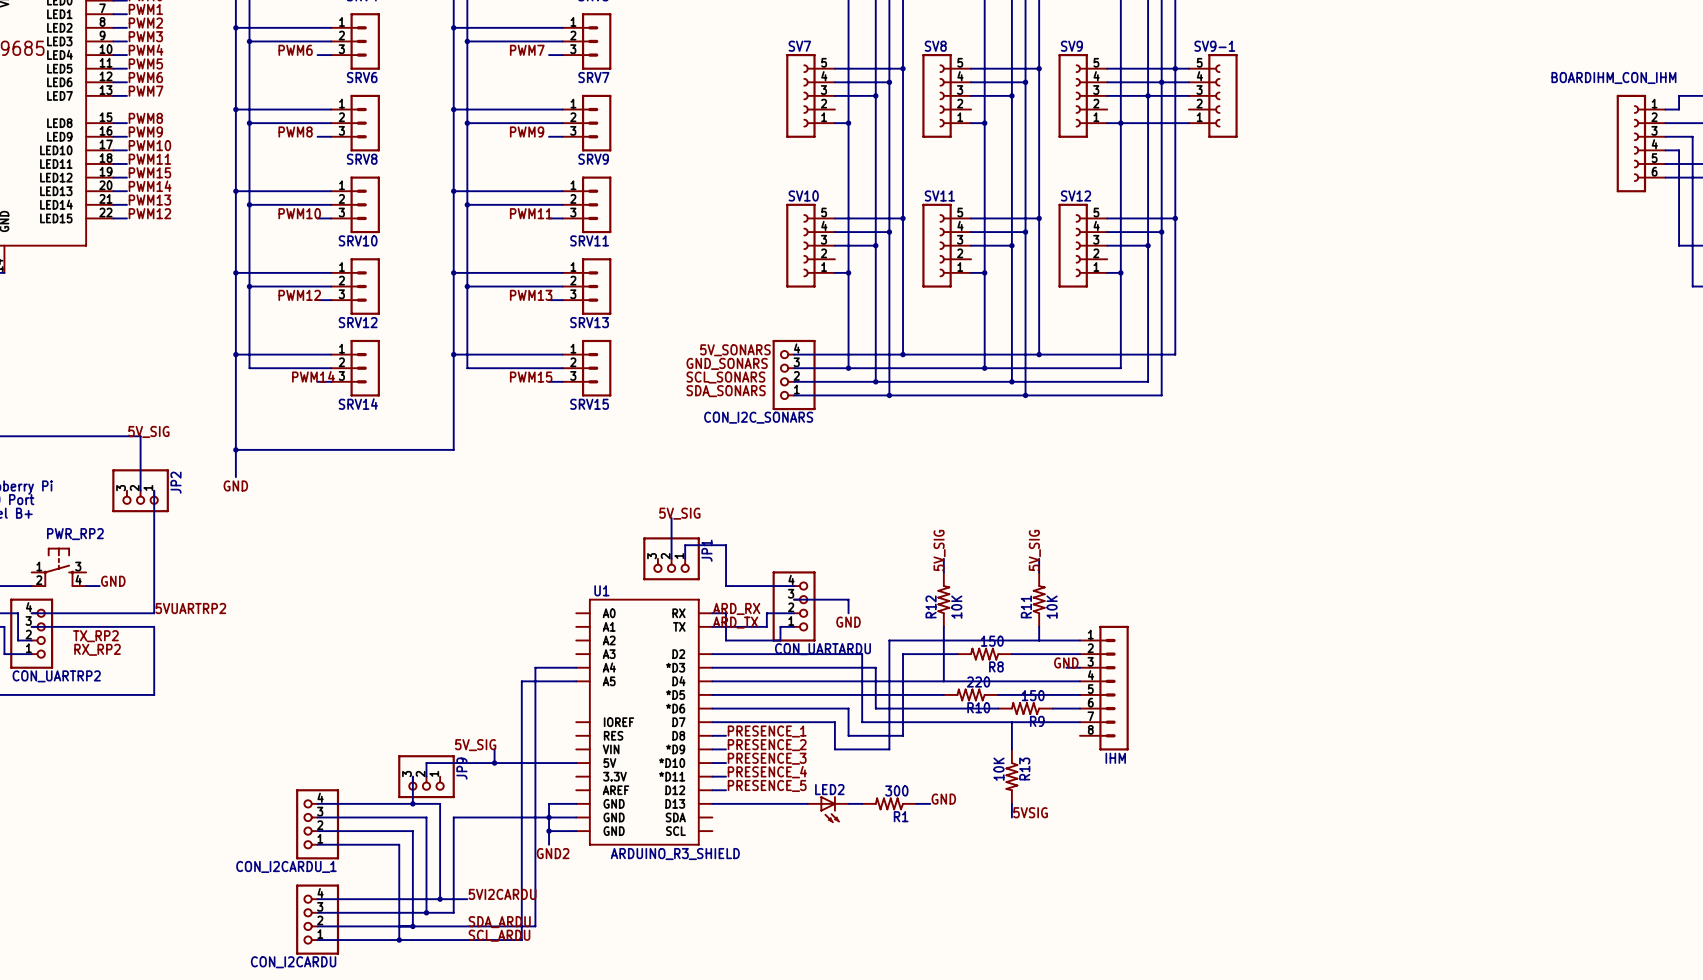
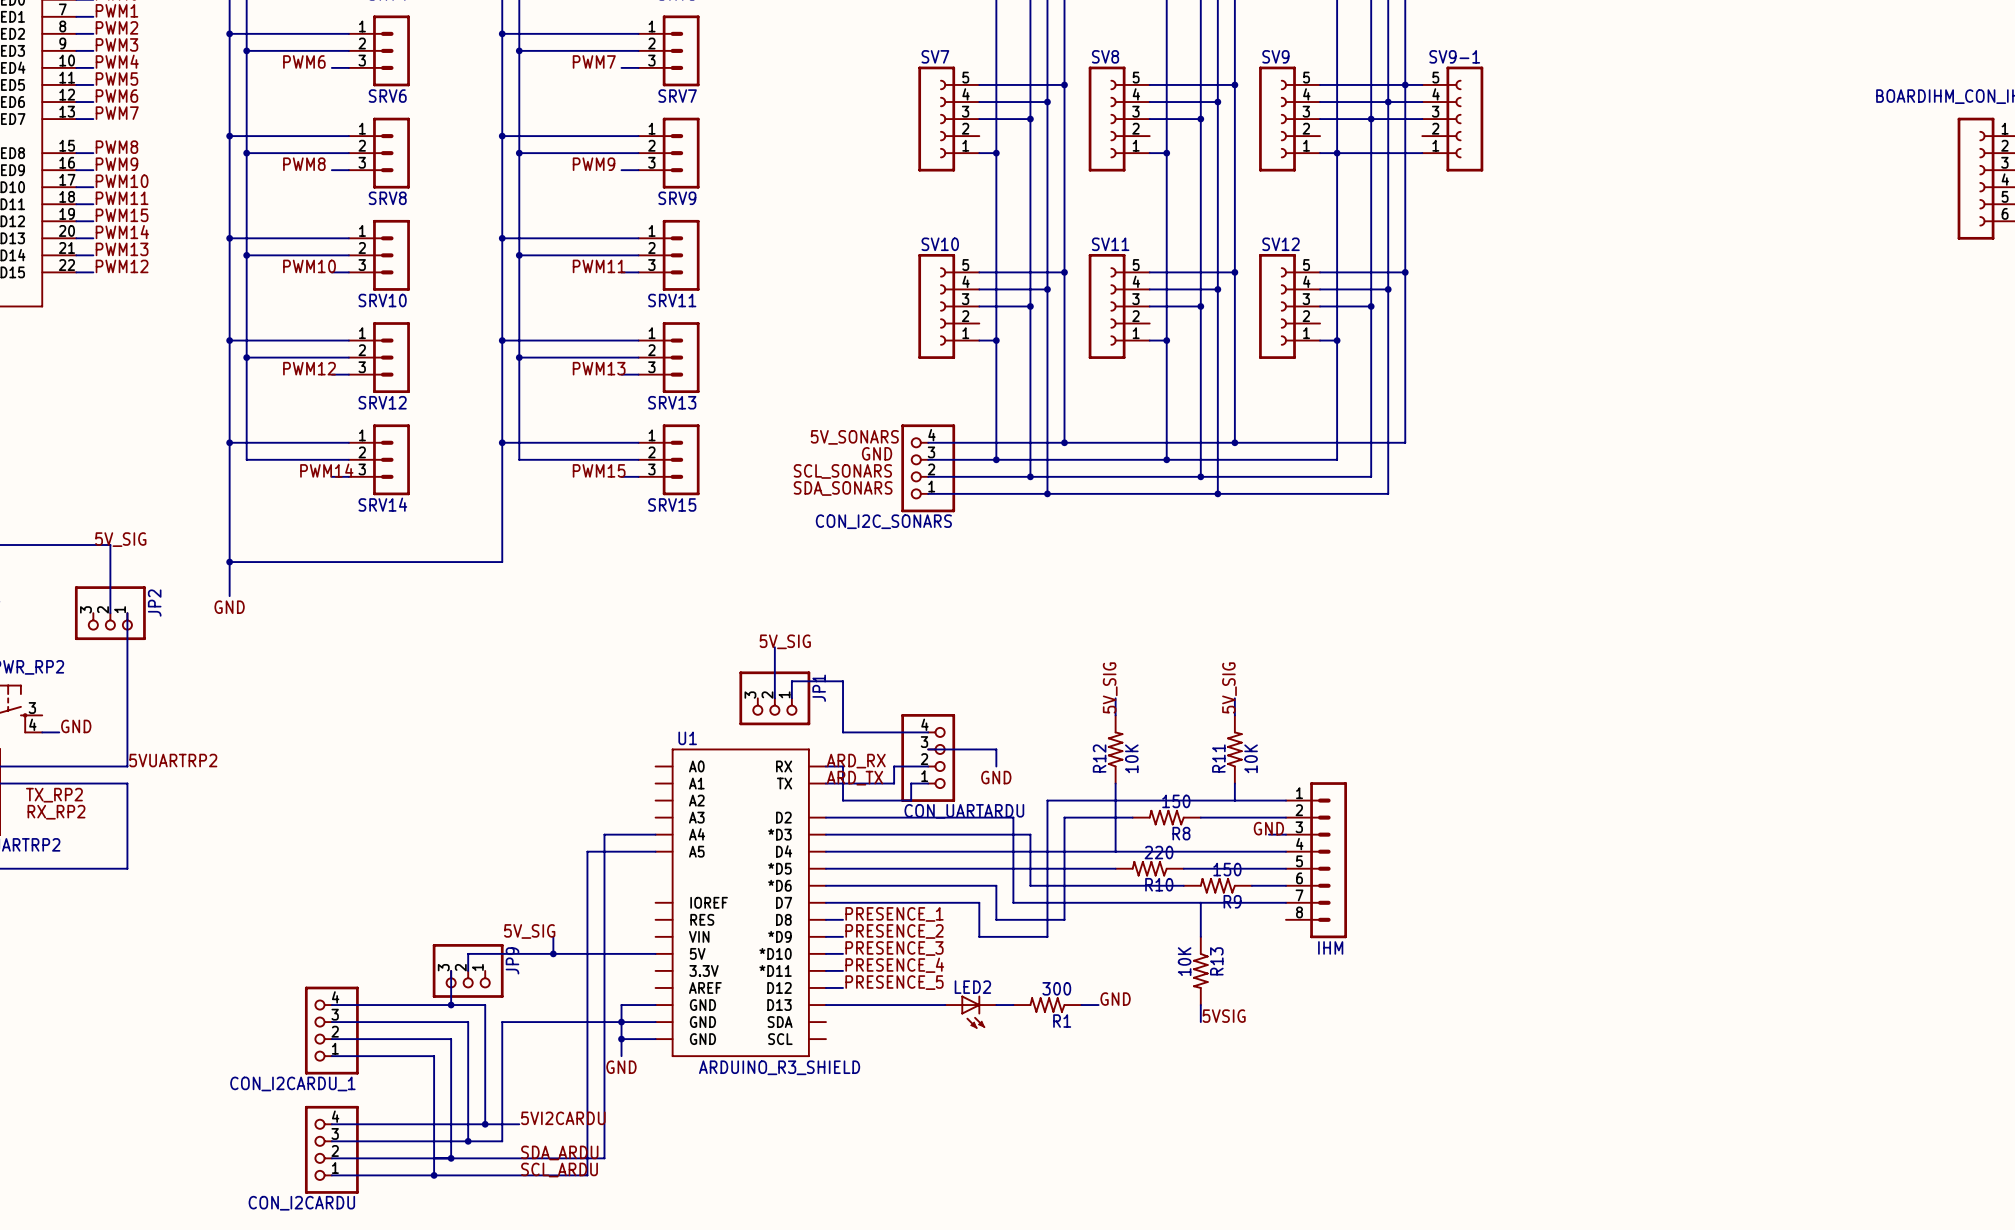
label: GND_SONARS (727, 363) -> none
label: none -> GND (877, 453)
label: GND2 (553, 853) -> GND (621, 1067)

